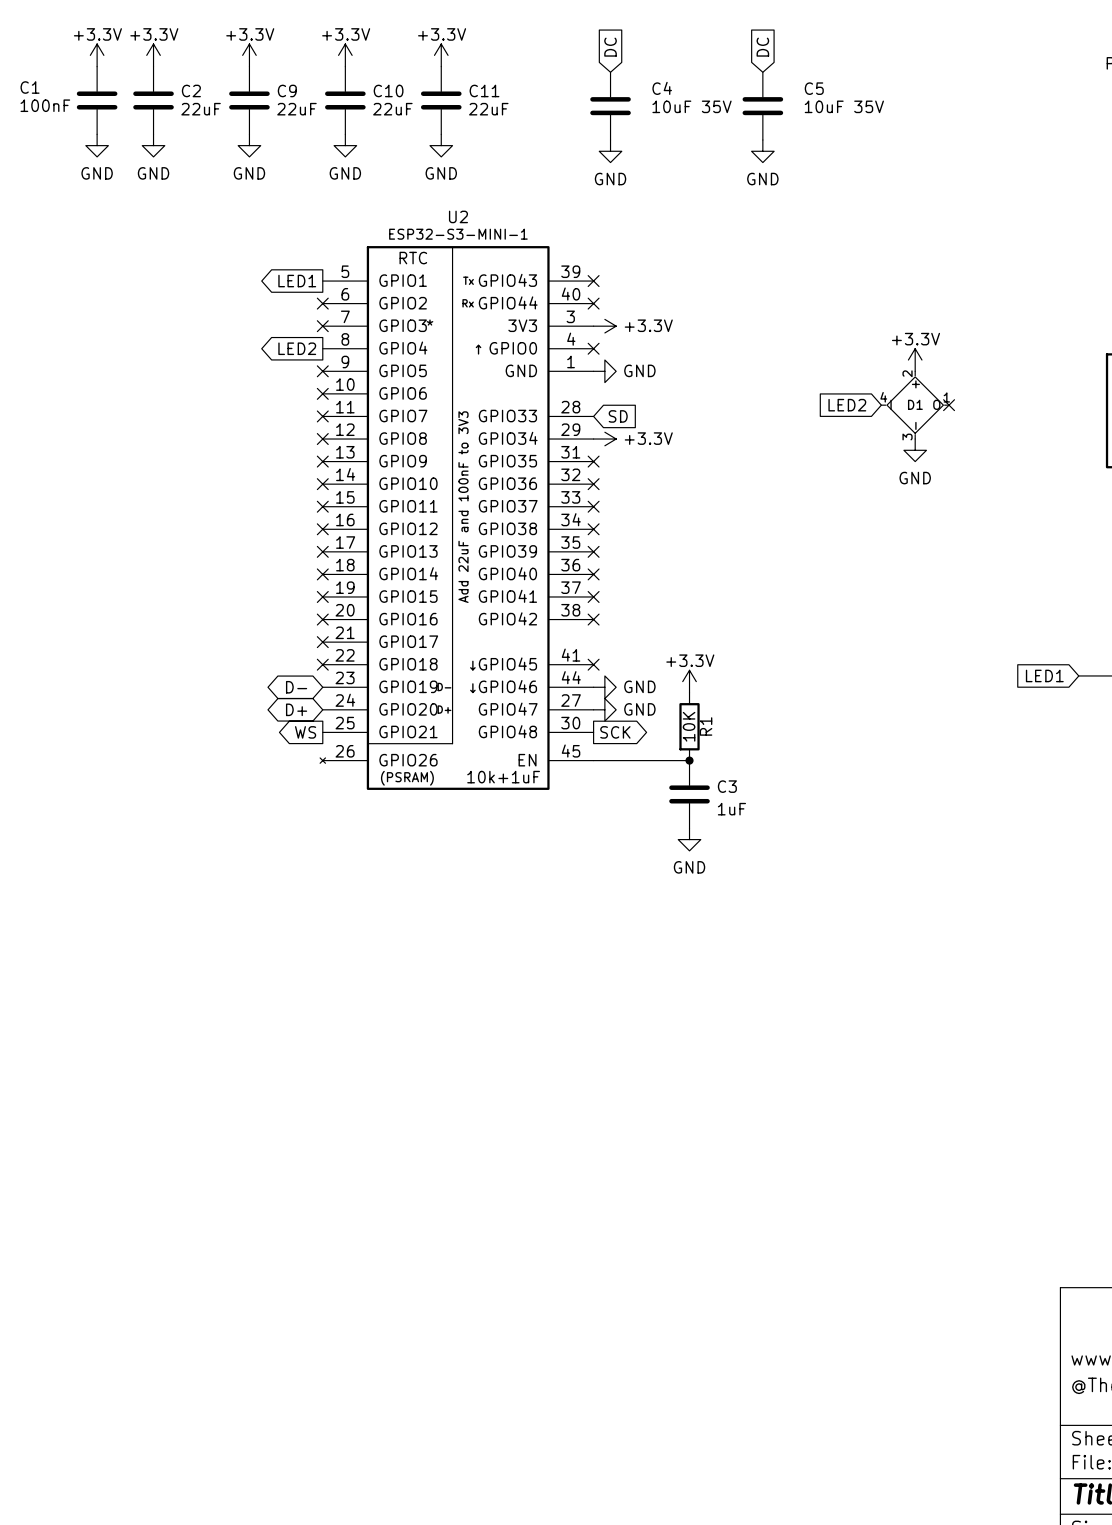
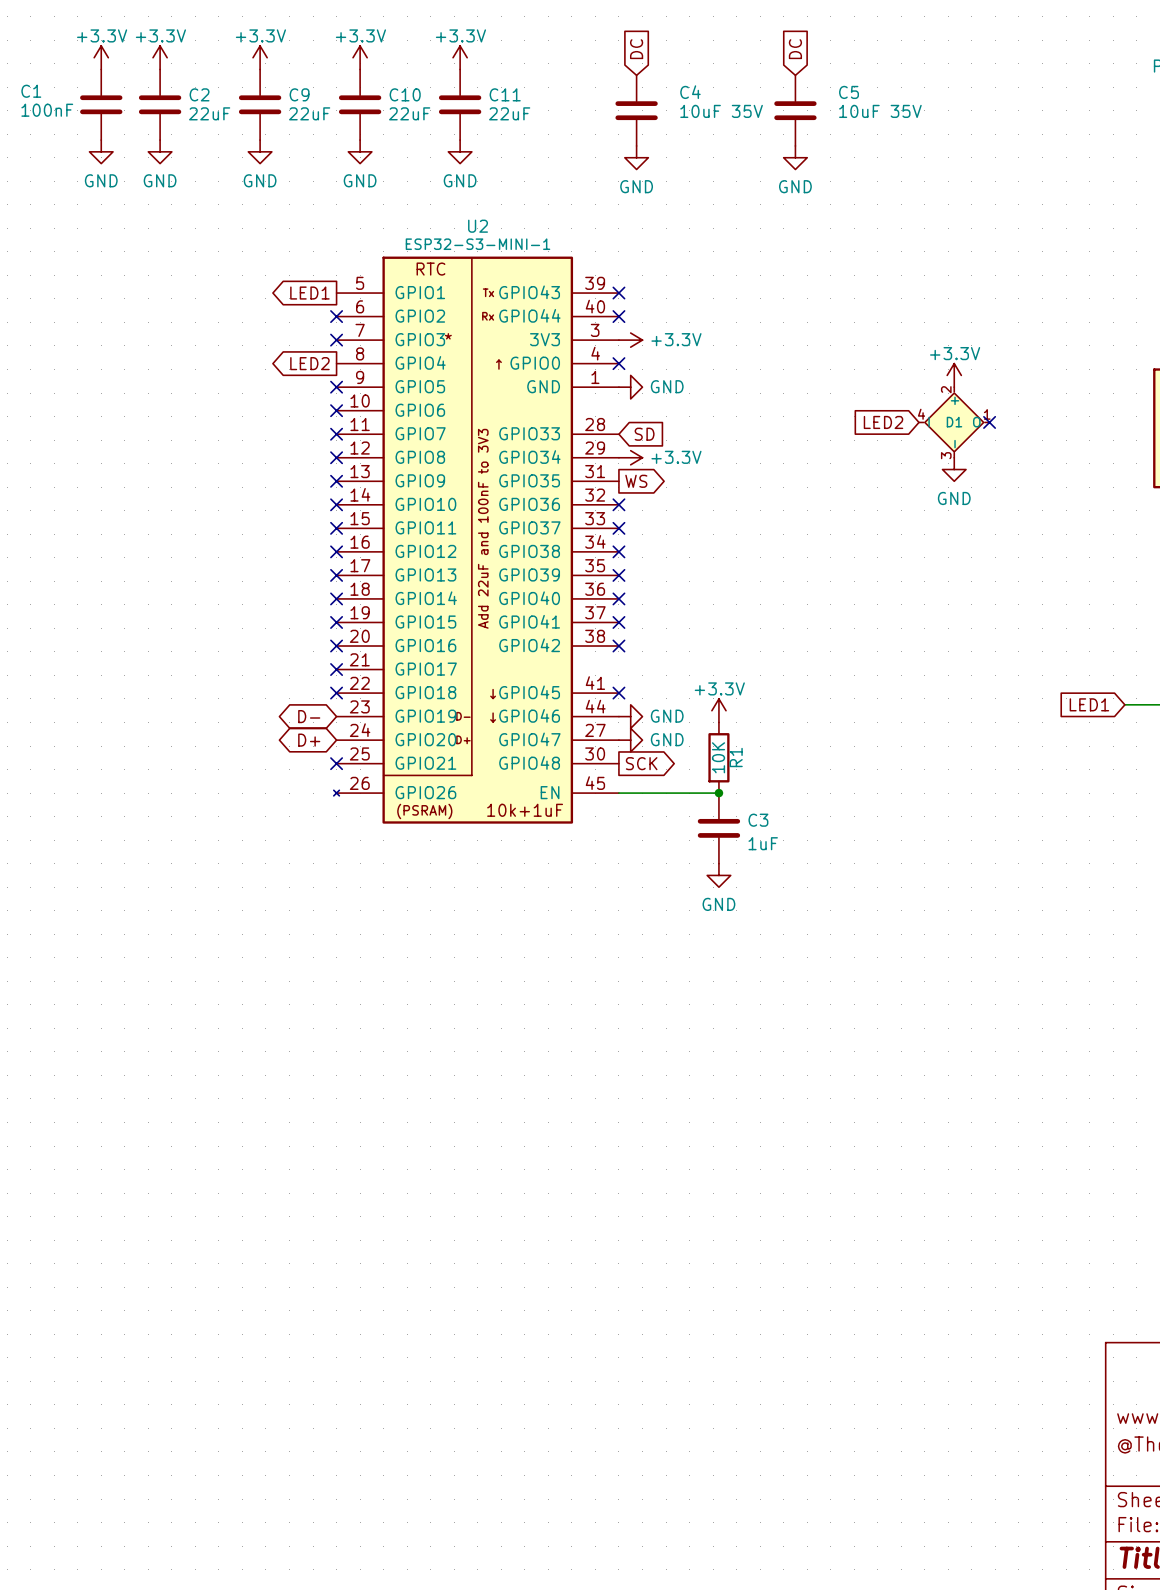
no-connect mark: (593, 461) -> none
global label: none -> WS (636, 481)
global label: WS (305, 732) -> none
no-connect mark: none -> (336, 763)

